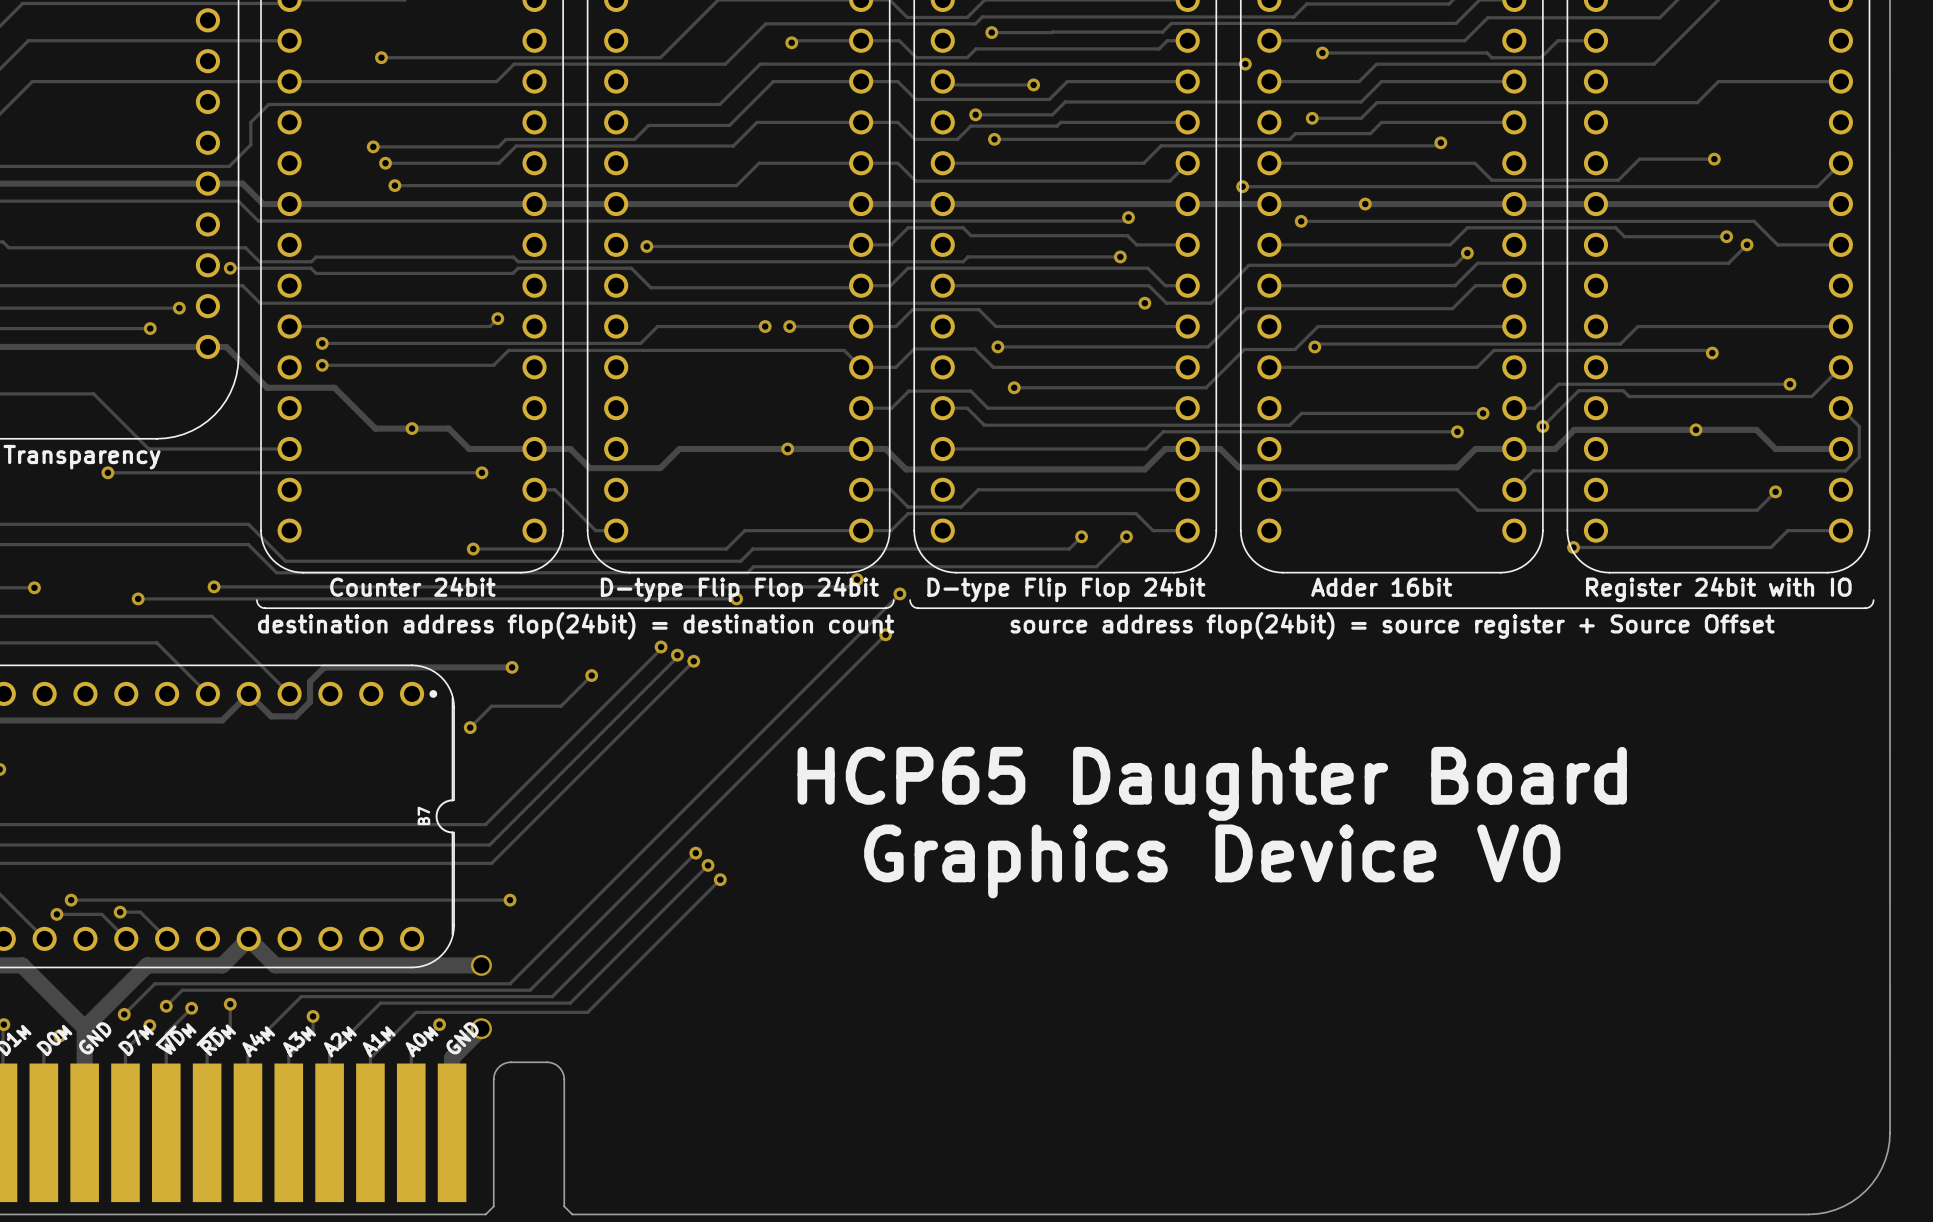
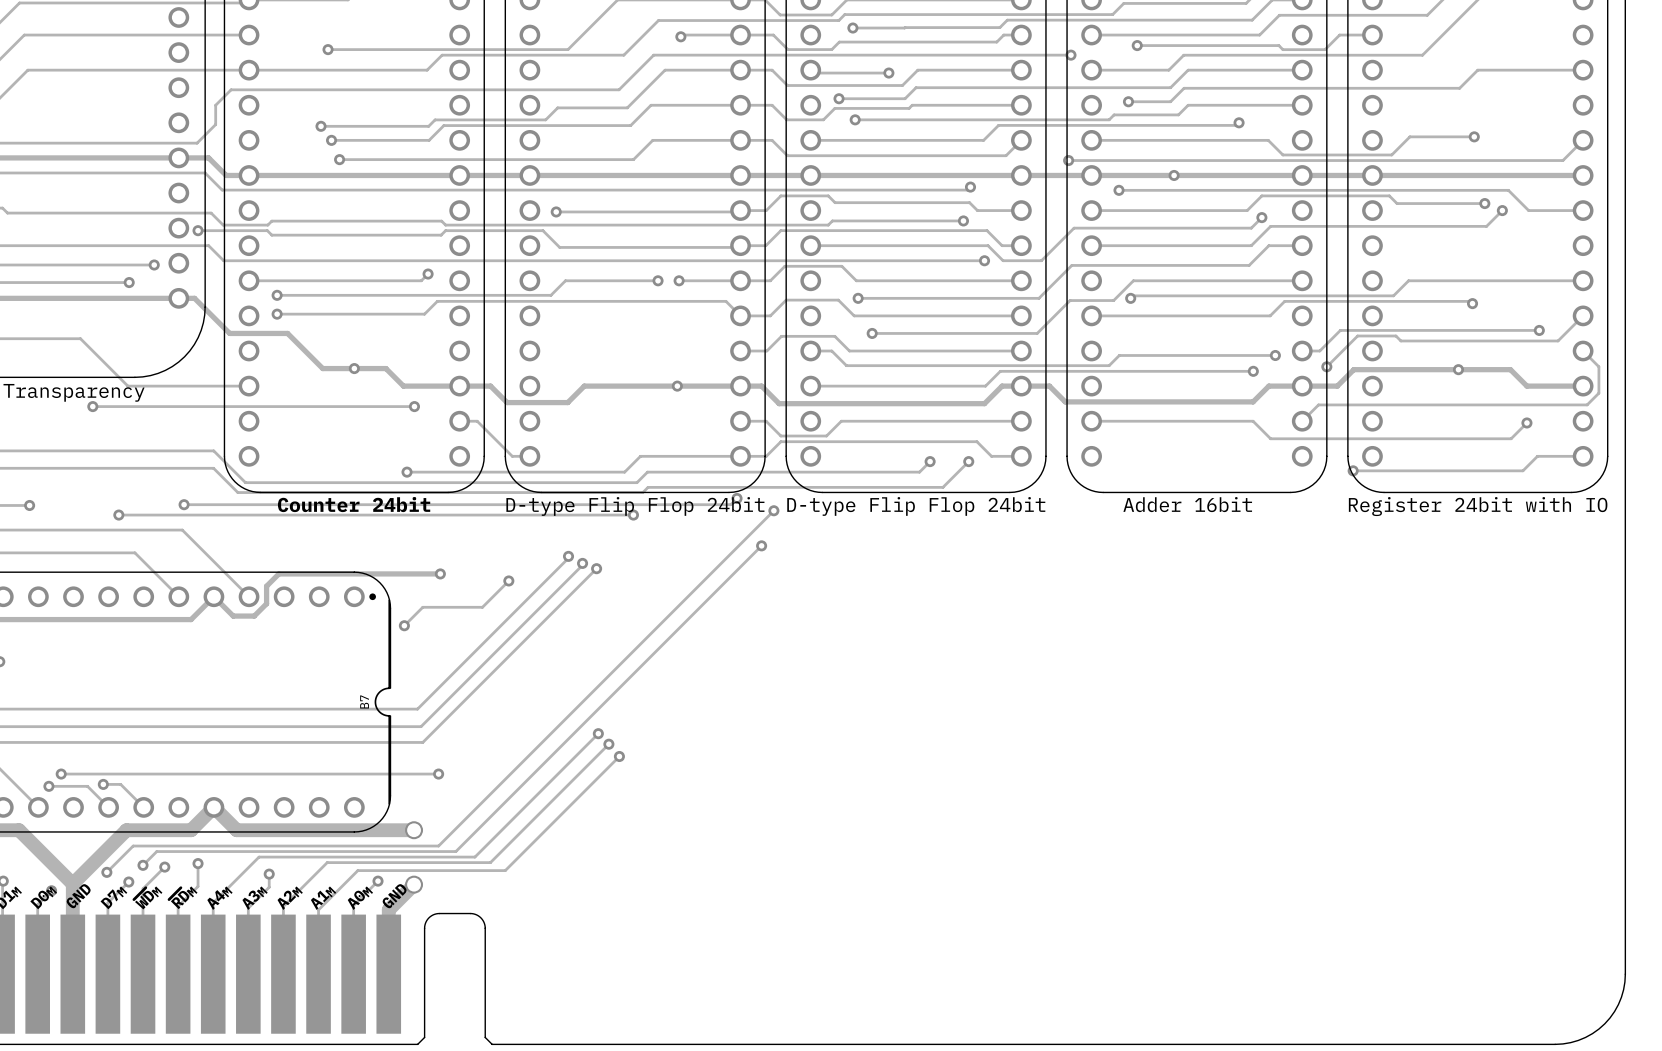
line: (256, 600) (259, 605) (265, 608) (885, 608) (891, 605) (893, 600) -> none
line: (910, 600) (912, 605) (918, 608) (1865, 608) (1871, 605) (1873, 600) -> none
text: destination address flop(24bit) = destination count (576, 625) -> none
text: source address flop(24bit) = source register + Source Offset (1392, 625) -> none
text: HCP65 Daughter Board (1212, 783) -> none
text: Graphics Device V0 (1212, 861) -> none

